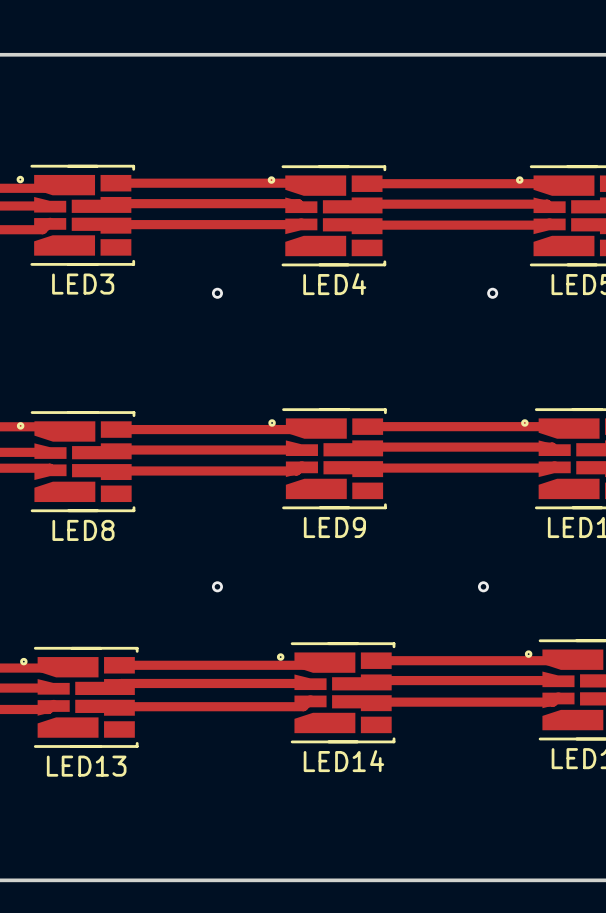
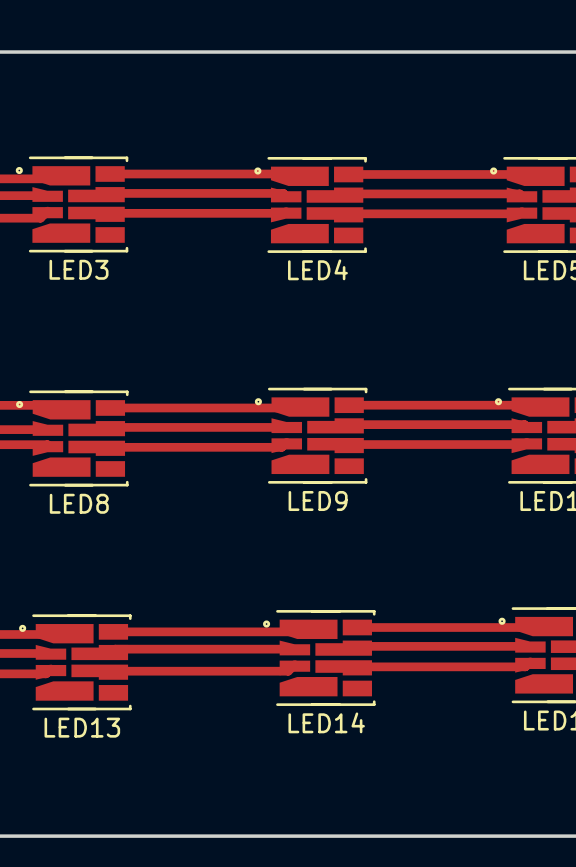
via: (217, 293) -> none
via: (492, 293) -> none
via: (217, 586) -> none
via: (483, 586) -> none

